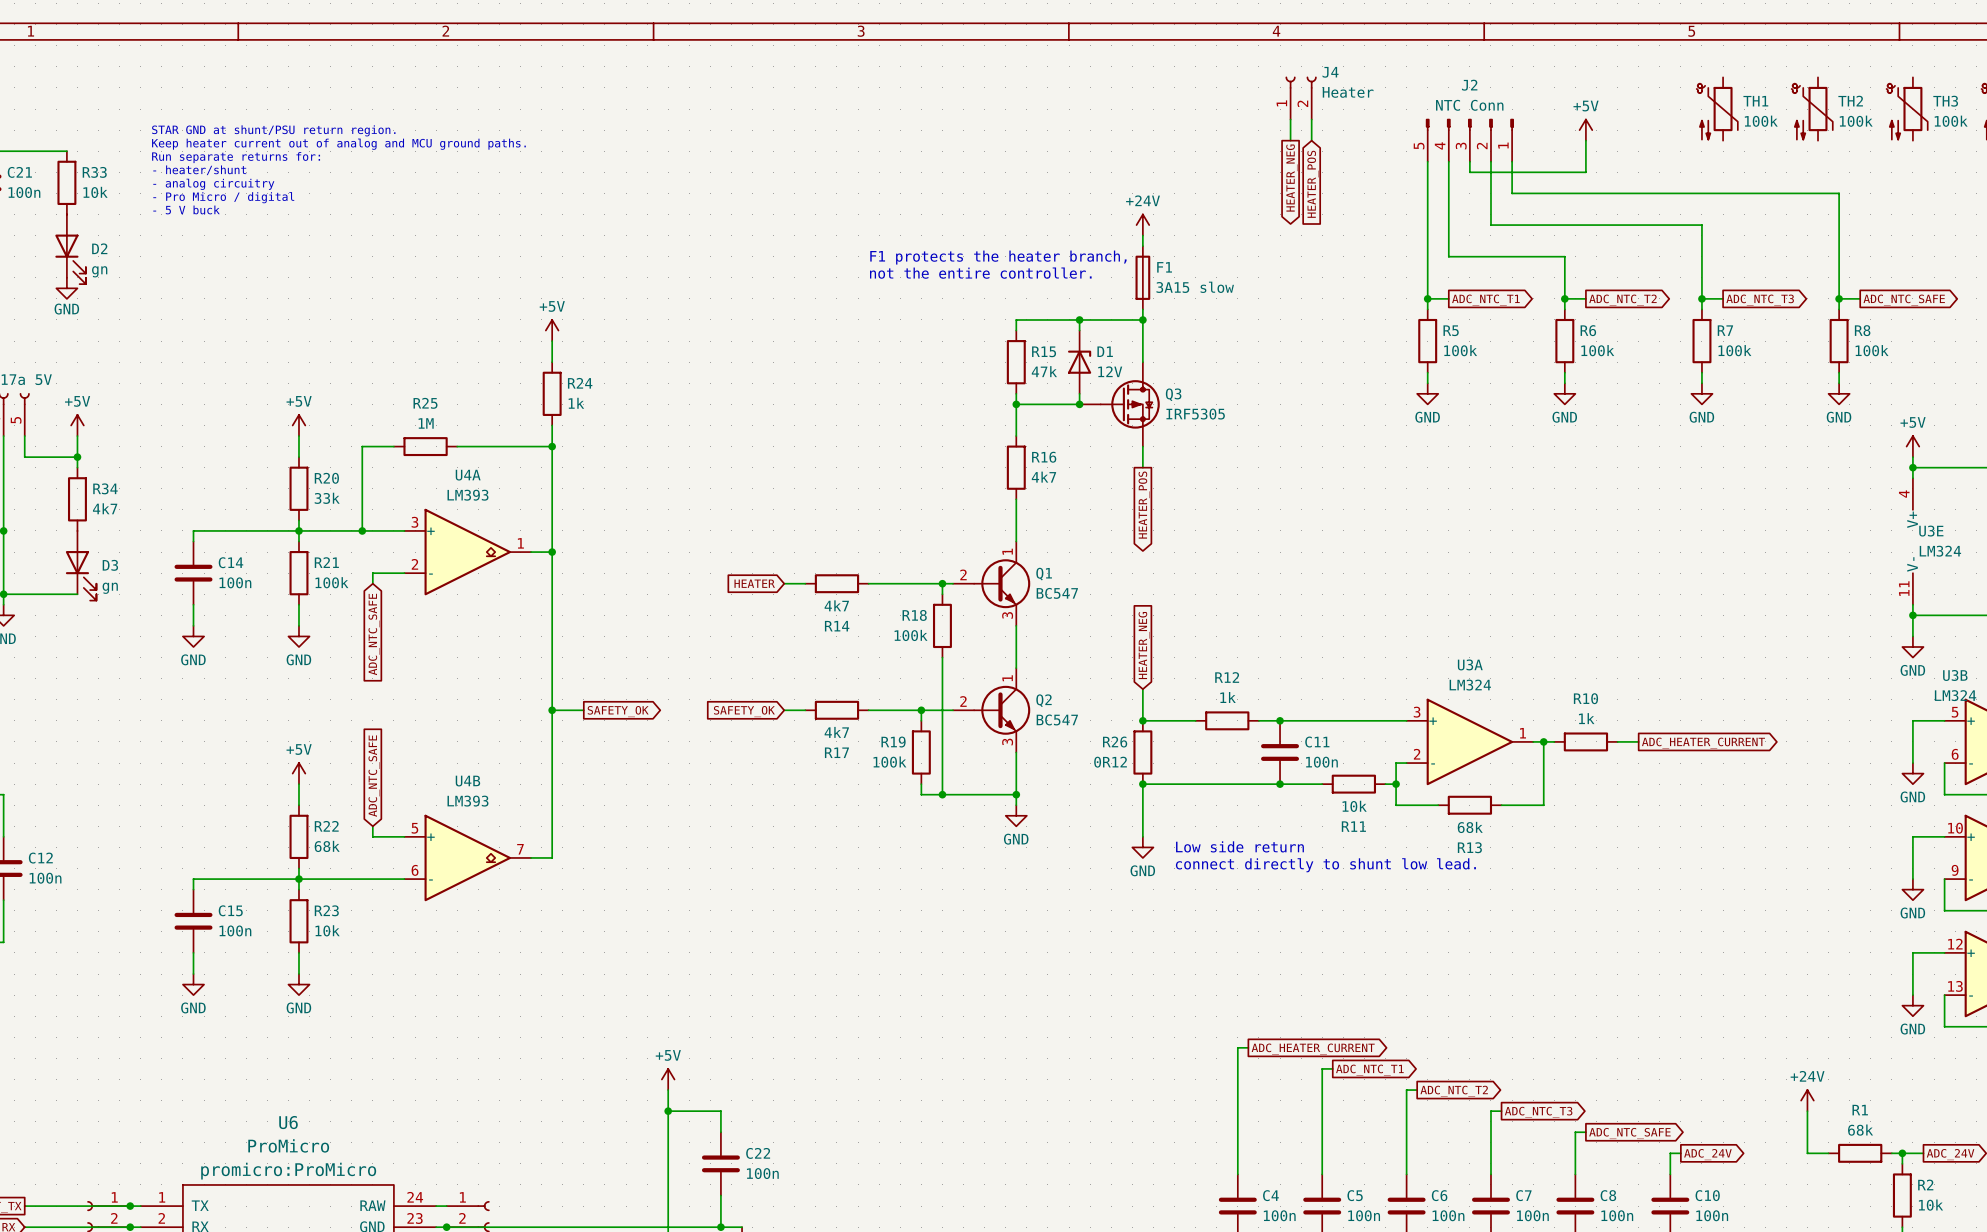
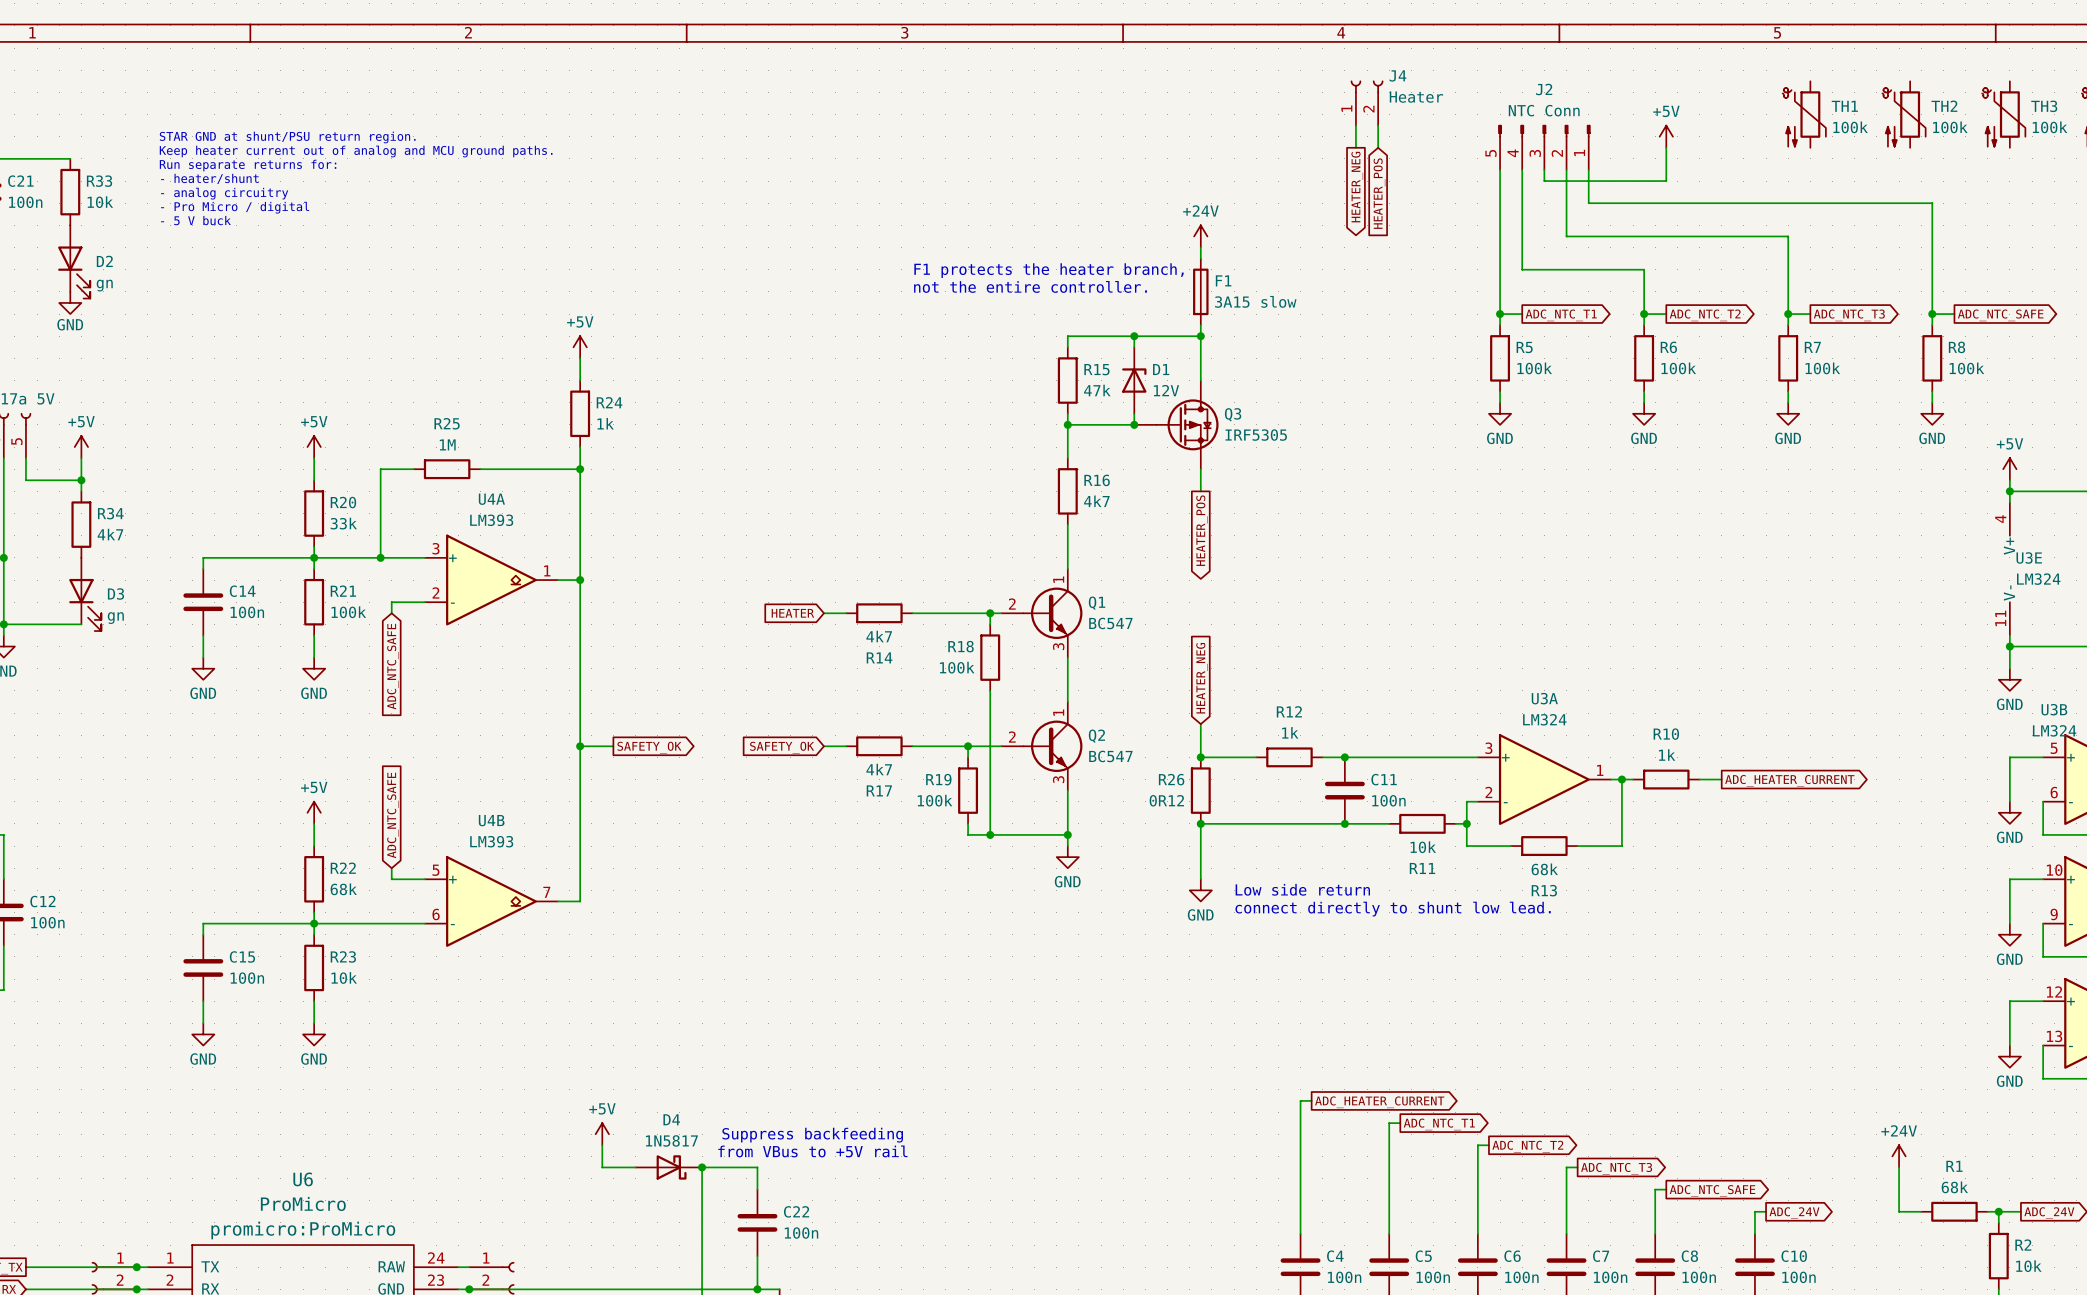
power symbol position: +5V (668, 1079) -> +5V (602, 1134)
text: none -> Suppress backfeeding (812, 1135)
wire: none -> (602, 1145) (602, 1167) (635, 1167)
wire: (668, 1090) (668, 1111) -> none
text: none -> from VBus to +5V rail (812, 1151)
D4: none -> 1N5817 (668, 1167)

